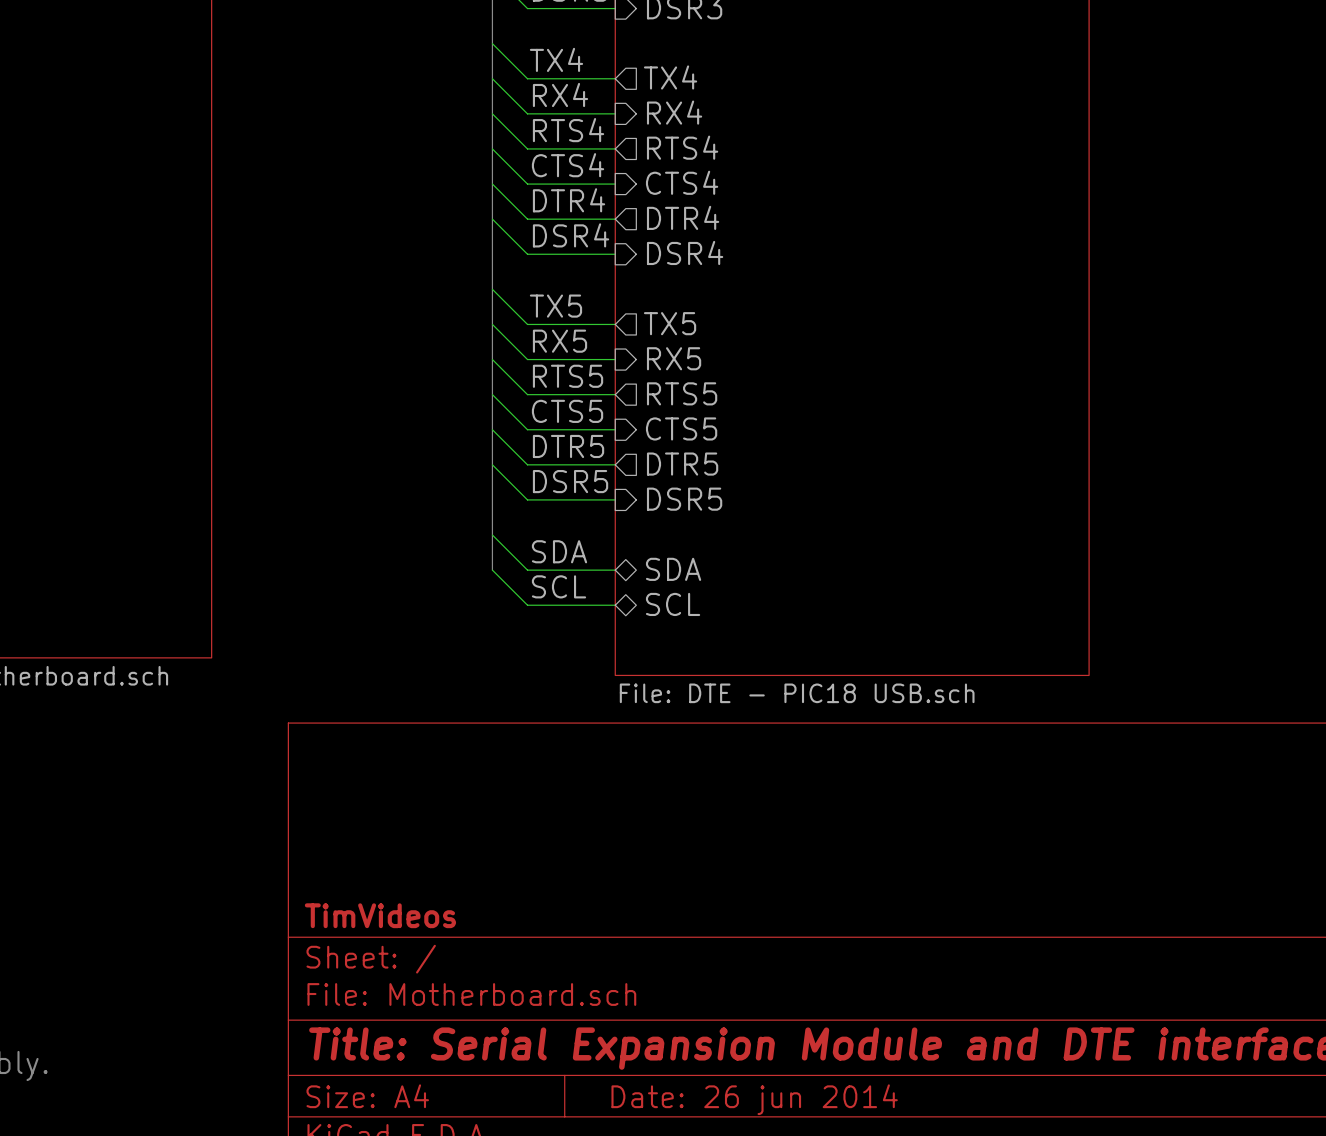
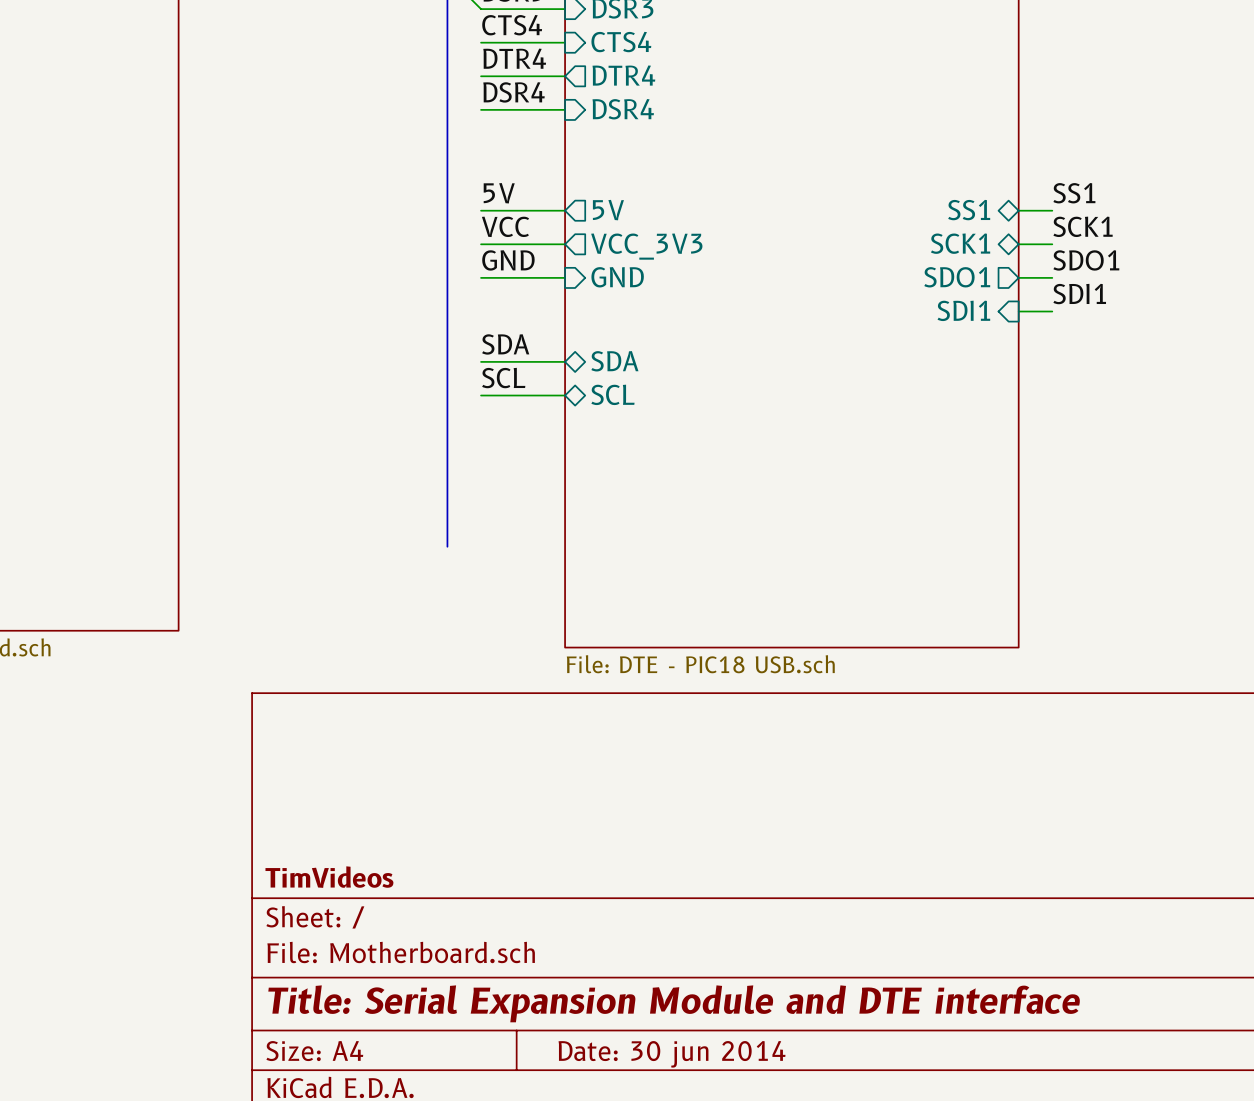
wire: (492, 43) (527, 78) -> none
wire: none -> (481, 42) (565, 42)
label: TX4 (556, 59) -> DTR4 (514, 58)
sheet pin: TX4 (670, 77) -> DTR4 (623, 75)
wire: (492, 78) (527, 113) -> none
label: RX4 (560, 95) -> DSR4 (514, 92)
sheet pin: RX4 (674, 112) -> DSR4 (623, 109)
wire: (492, 113) (527, 148) (615, 148) -> none
label: RTS4 (568, 130) -> none
sheet pin: RTS4 (682, 147) -> none
wire: (492, 148) (527, 184) (615, 184) -> none
label position: CTS4 (568, 165) -> CTS4 (512, 25)
sheet pin position: CTS4 (682, 182) -> CTS4 (621, 42)
wire: (492, 184) (527, 219) -> none
label: DTR4 (569, 200) -> 5V (499, 193)
label: none -> SS1 (1074, 193)
sheet pin: DTR4 (683, 217) -> 5V (608, 210)
sheet pin: none -> SS1 (969, 210)
wire: (492, 219) (527, 254) -> none
wire: none -> (1018, 210) (1052, 210)
label: DSR4 (571, 235) -> VCC (505, 226)
label: none -> SCK1 (1083, 226)
sheet pin shape: input (685, 252) -> output (646, 246)
sheet pin: DSR4 (685, 252) -> VCC_3V3 (646, 246)
sheet pin: none -> SCK1 (960, 243)
wire: none -> (1018, 244) (1052, 244)
label: none -> GND (508, 260)
label: none -> SDO1 (1086, 260)
sheet pin: none -> GND (617, 277)
sheet pin: none -> SDO1 (957, 277)
wire: (492, 289) (527, 324) (615, 324) -> none
wire: none -> (481, 277) (565, 277)
wire: none -> (1018, 277) (1052, 277)
label: TX5 (555, 306) -> none
label: none -> SDI1 (1079, 294)
sheet pin: TX5 (670, 323) -> none
sheet pin: none -> SDI1 (963, 310)
wire: (492, 324) (527, 359) (615, 359) -> none
wire: none -> (1018, 311) (1052, 311)
label: RX5 (560, 341) -> none
sheet pin: RX5 (674, 358) -> none
wire: (492, 359) (527, 394) (615, 394) -> none
label: RTS5 (568, 376) -> none
wire: none -> (481, 361) (565, 361)
sheet pin: RTS5 (682, 393) -> none
wire: (492, 394) (527, 429) (615, 429) -> none
label: CTS5 (567, 411) -> none
wire: none -> (481, 395) (565, 395)
sheet pin: CTS5 (681, 428) -> none
wire: (492, 429) (527, 464) (615, 464) -> none
label: DTR5 (568, 446) -> none
wire: (492, 464) (527, 499) (615, 499) -> none
sheet pin: DTR5 (682, 464) -> none
label: DSR5 (570, 481) -> none
sheet pin: DSR5 (684, 499) -> none
wire: (492, 535) (527, 570) (615, 570) -> none
label position: SDA (559, 551) -> SDA (505, 344)
sheet pin position: SDA (673, 569) -> SDA (614, 361)
wire: (492, 570) (527, 605) (615, 605) -> none
label position: SCL (558, 586) -> SCL (503, 378)
sheet pin position: SCL (673, 604) -> SCL (612, 394)
title block: Date: 26 jun 2014 (754, 1099) -> Date: 30 jun 2014 (672, 1054)

